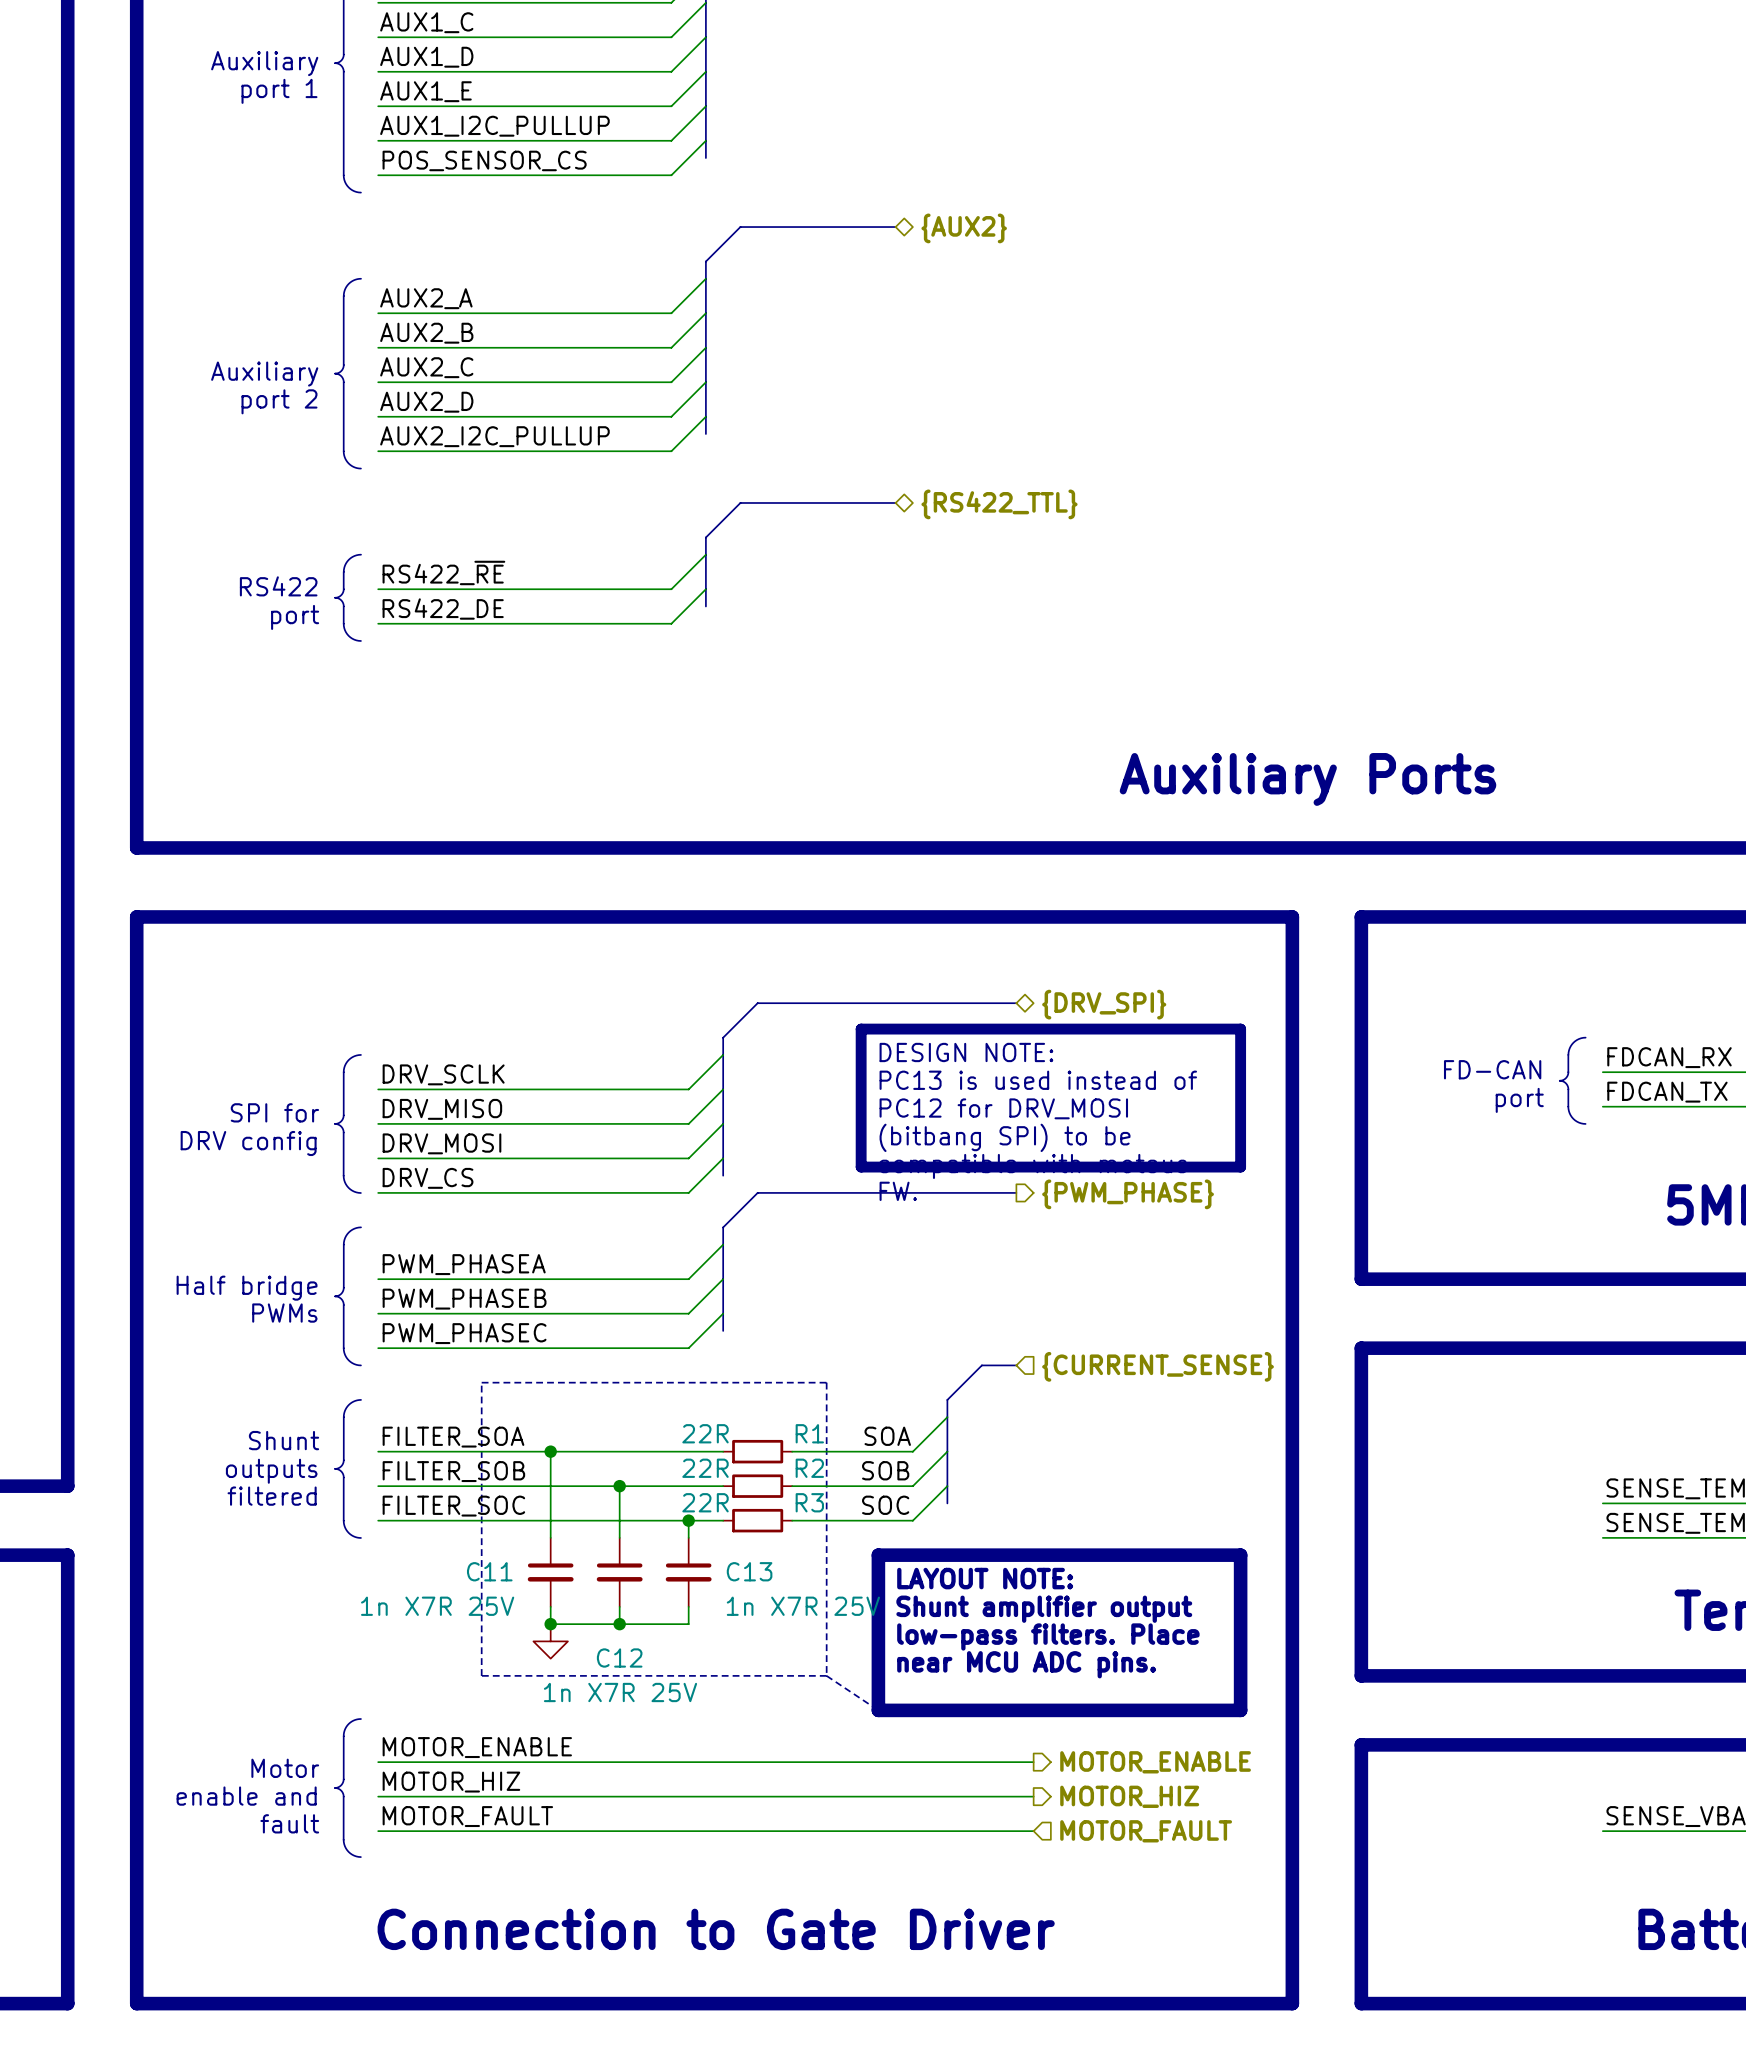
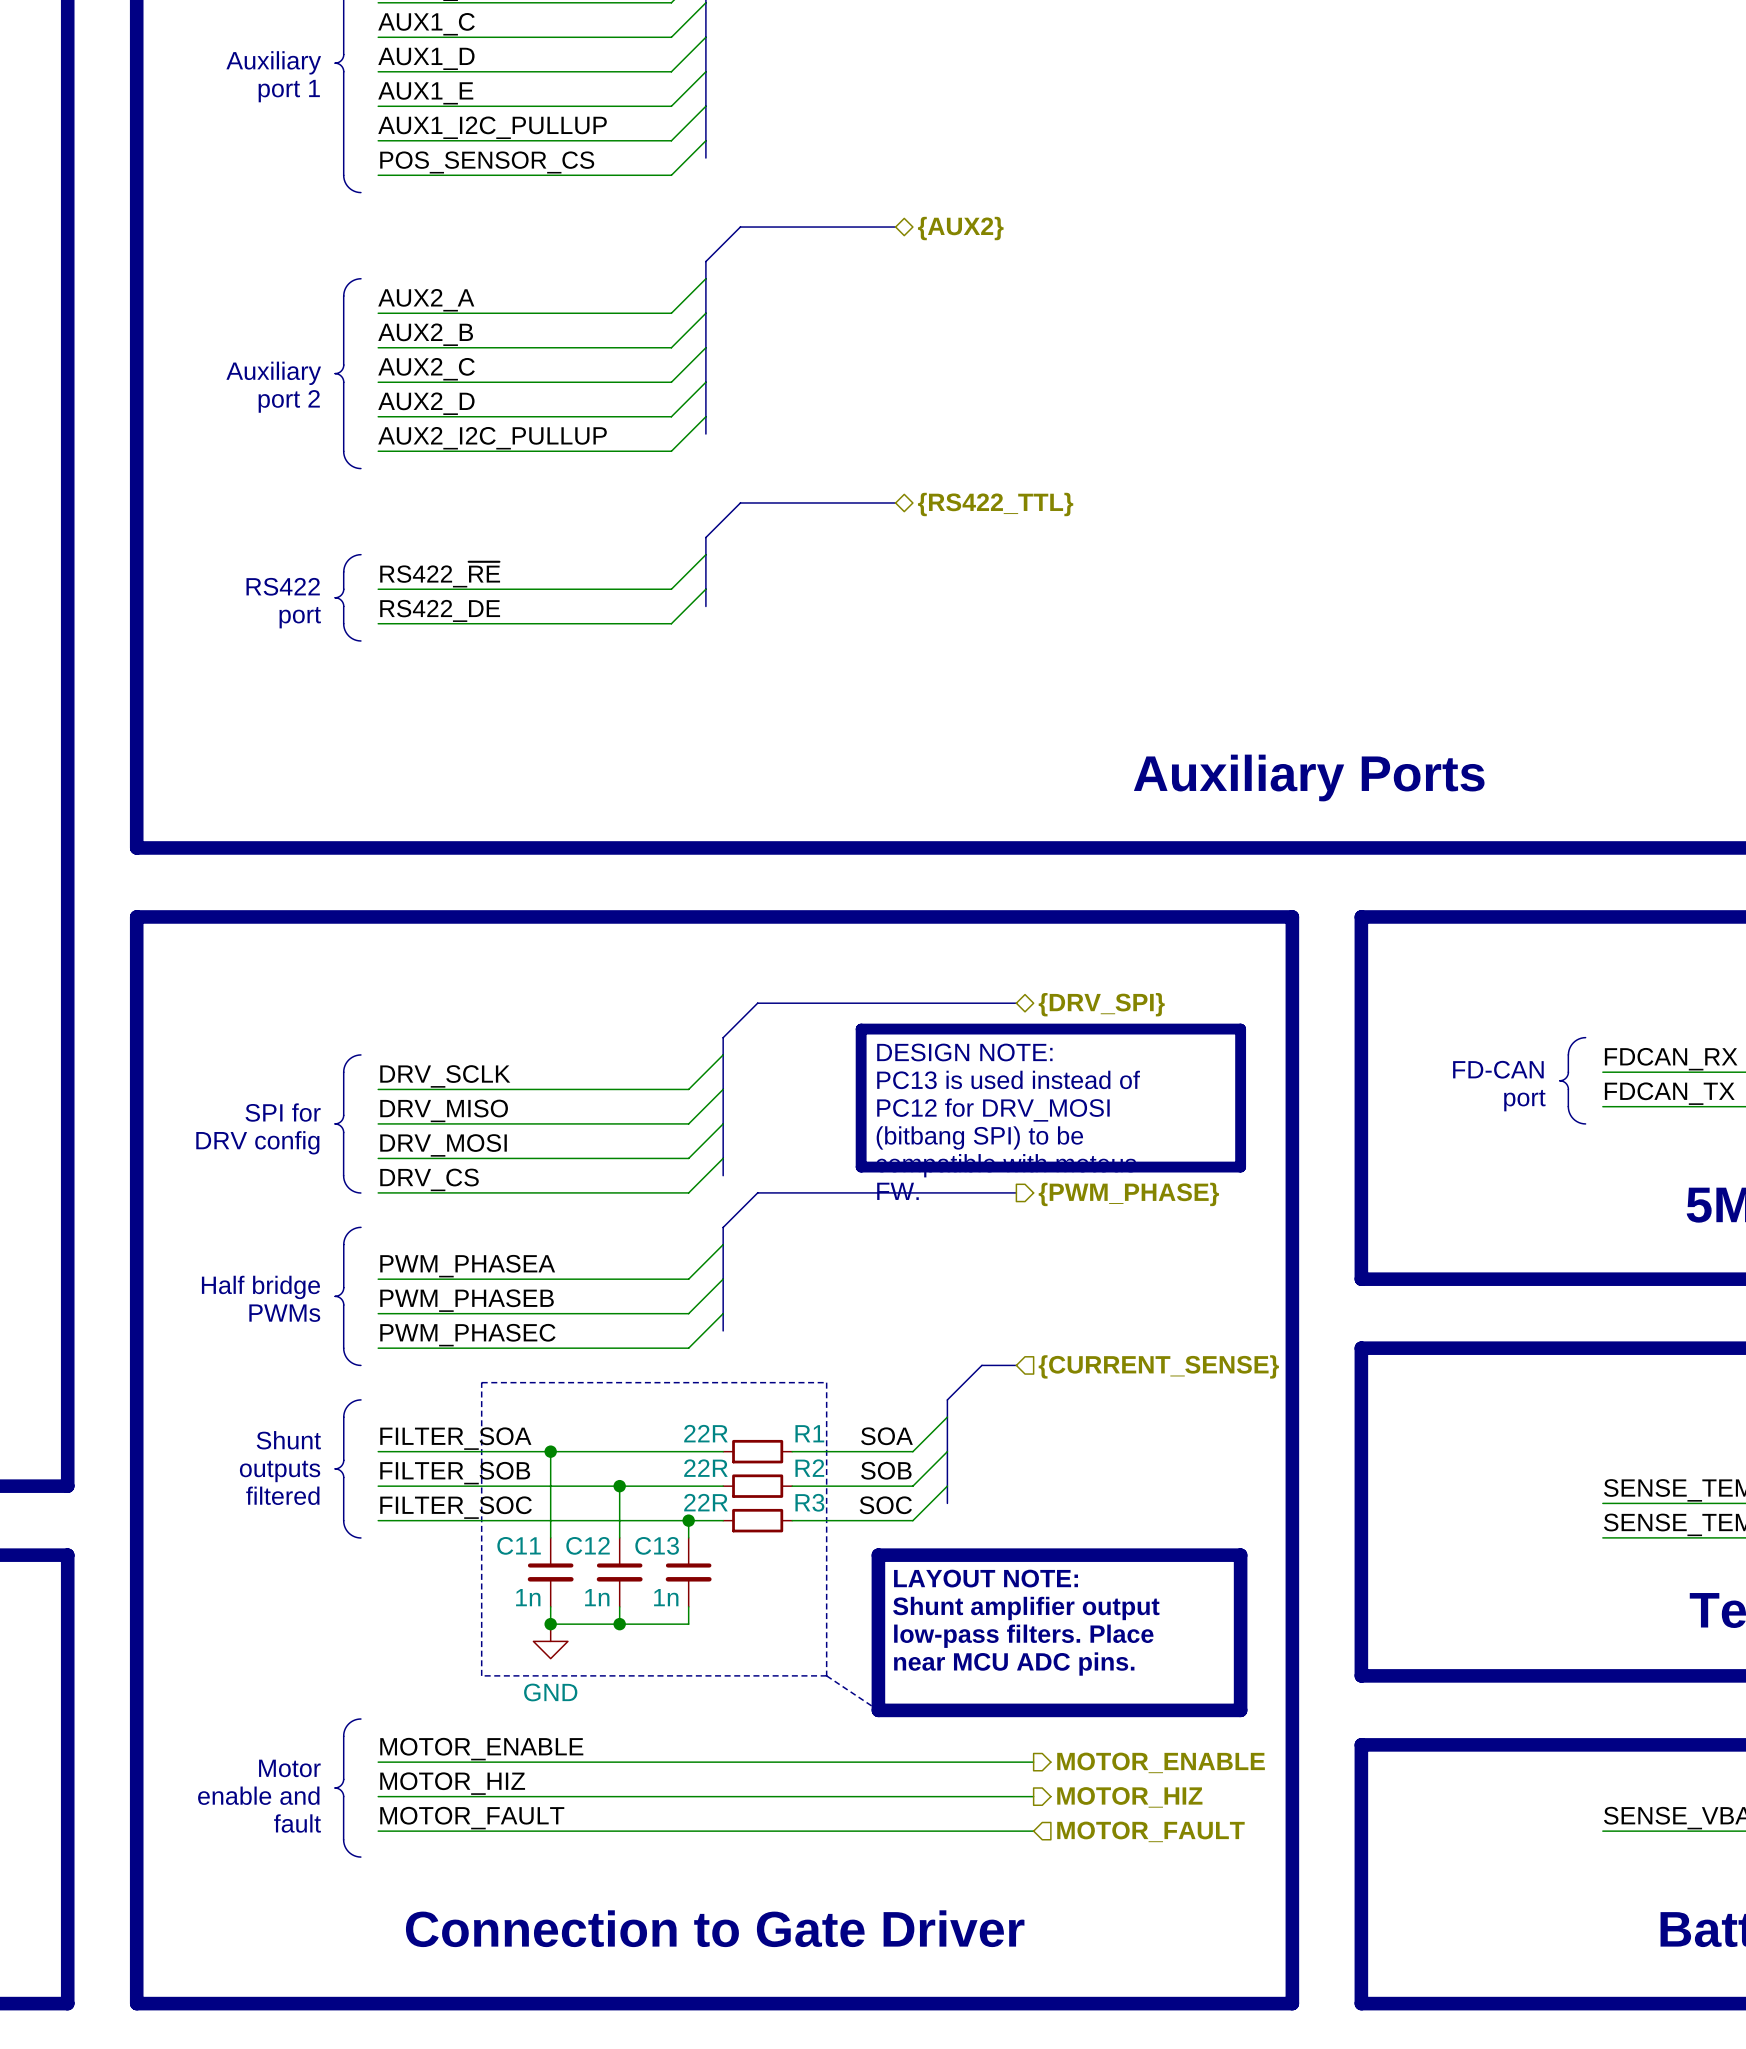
C11 name position: C11 (489, 1571) -> C11 (519, 1545)
C13 name position: C13 (749, 1571) -> C13 (657, 1545)
C11 value: 1n X7R 25V (437, 1606) -> 1n (528, 1597)
C13 value: 1n X7R 25V (803, 1606) -> 1n (666, 1597)
C12 name position: C12 (619, 1658) -> C12 (588, 1545)
power symbol text: none -> GND (550, 1692)
C12 value: 1n X7R 25V (620, 1692) -> 1n (597, 1597)

